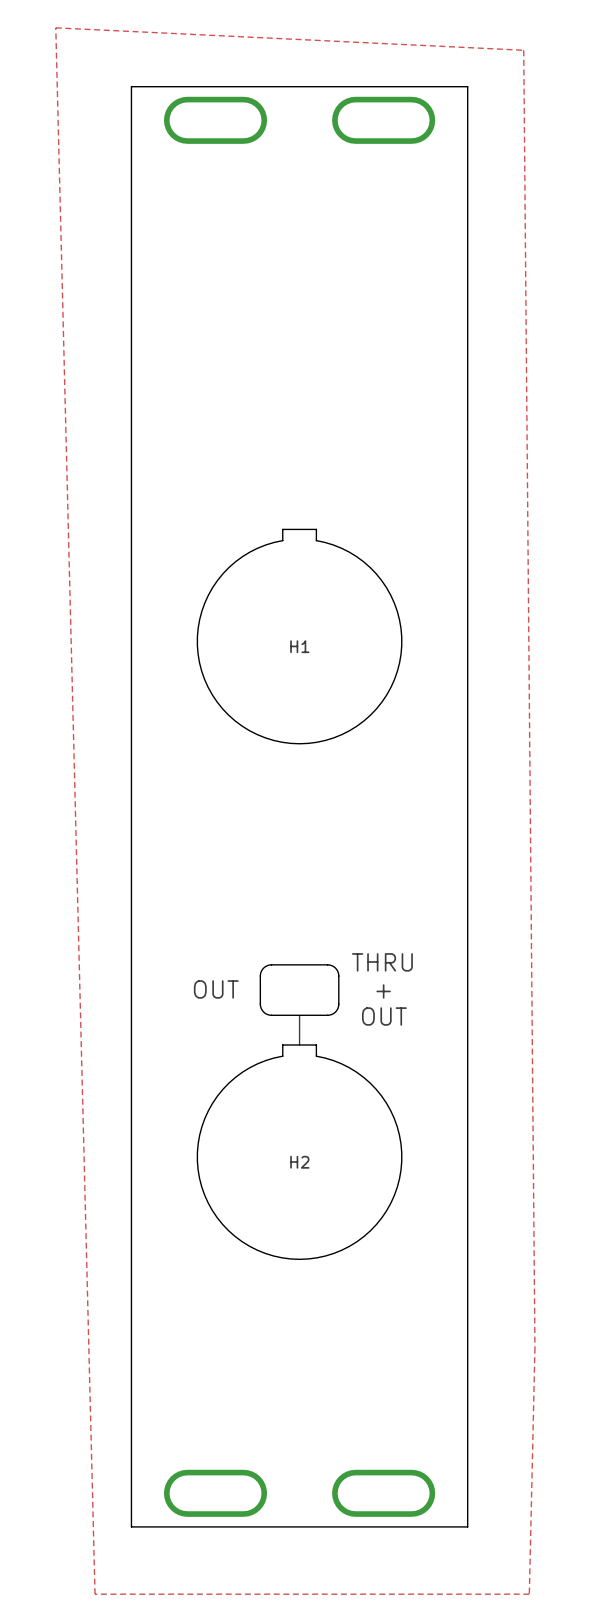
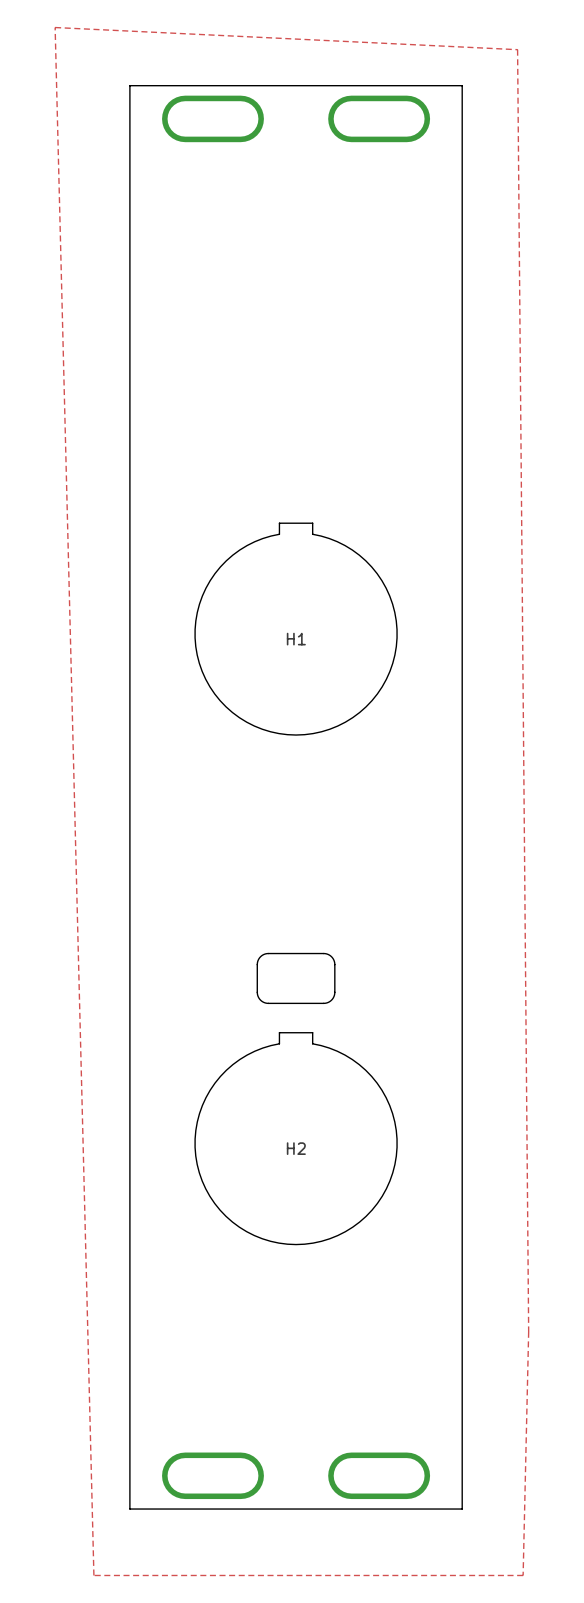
text: THRU (382, 962) -> none
text: OUT (216, 989) -> none
text: + (383, 991) -> none
line: (299, 1015) (299, 1044) -> none
text: OUT (384, 1016) -> none

